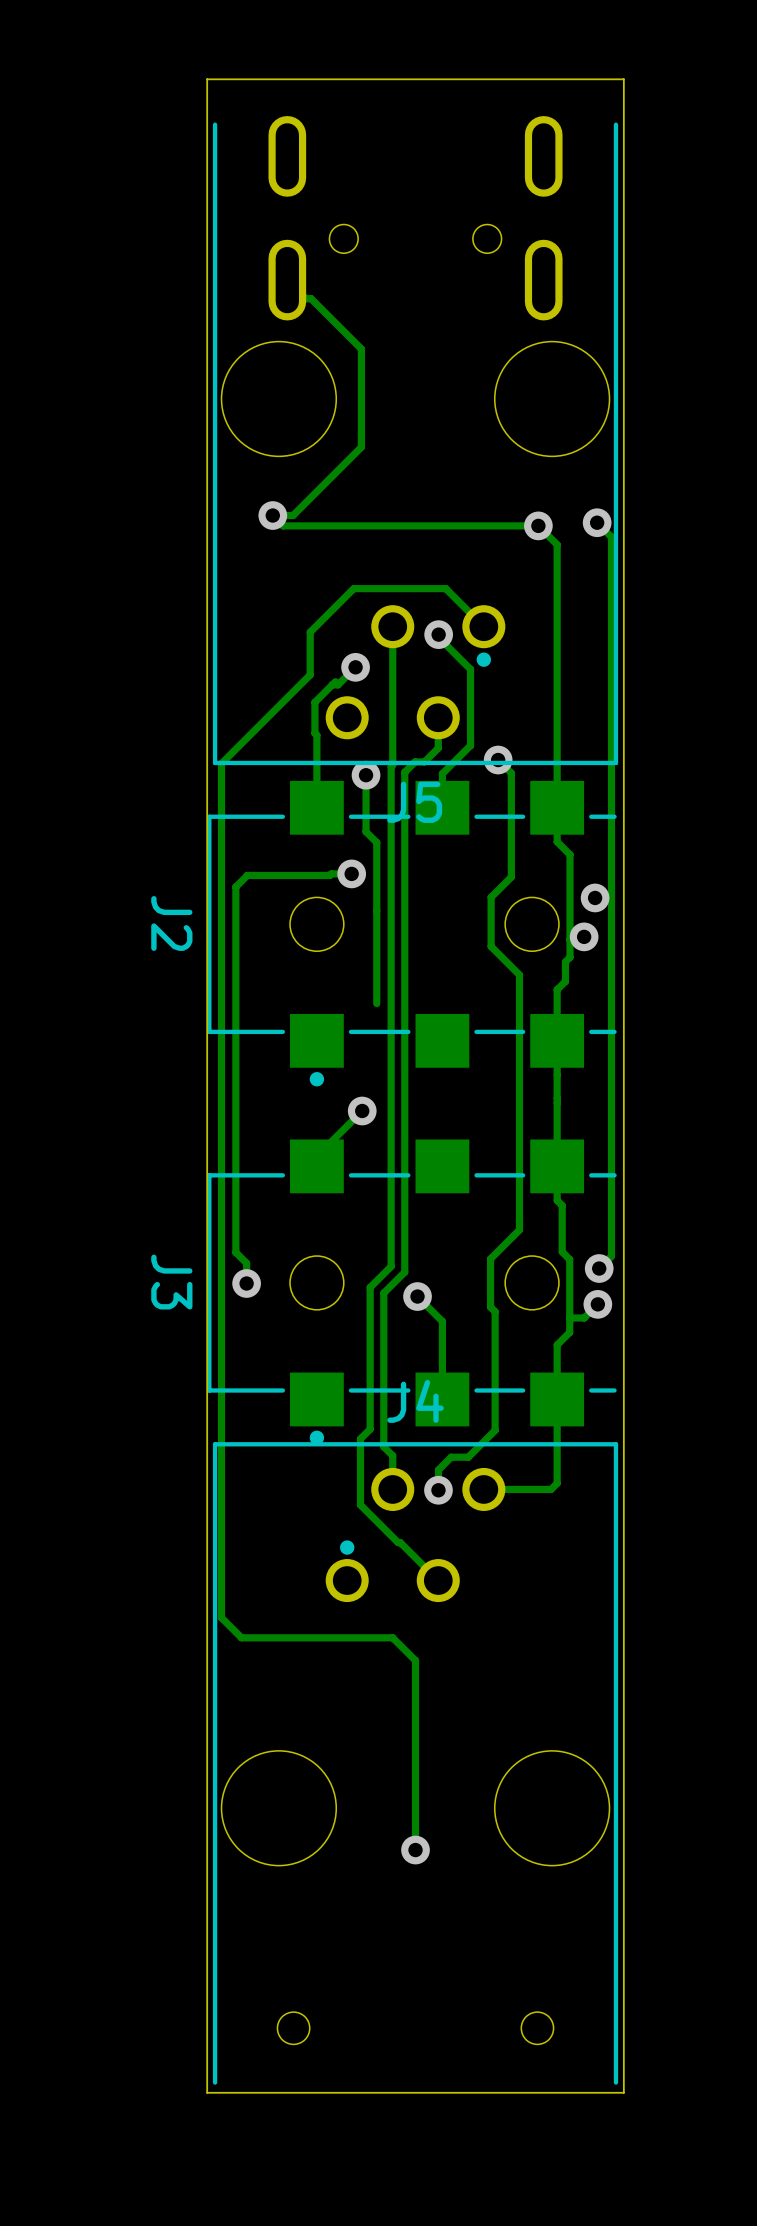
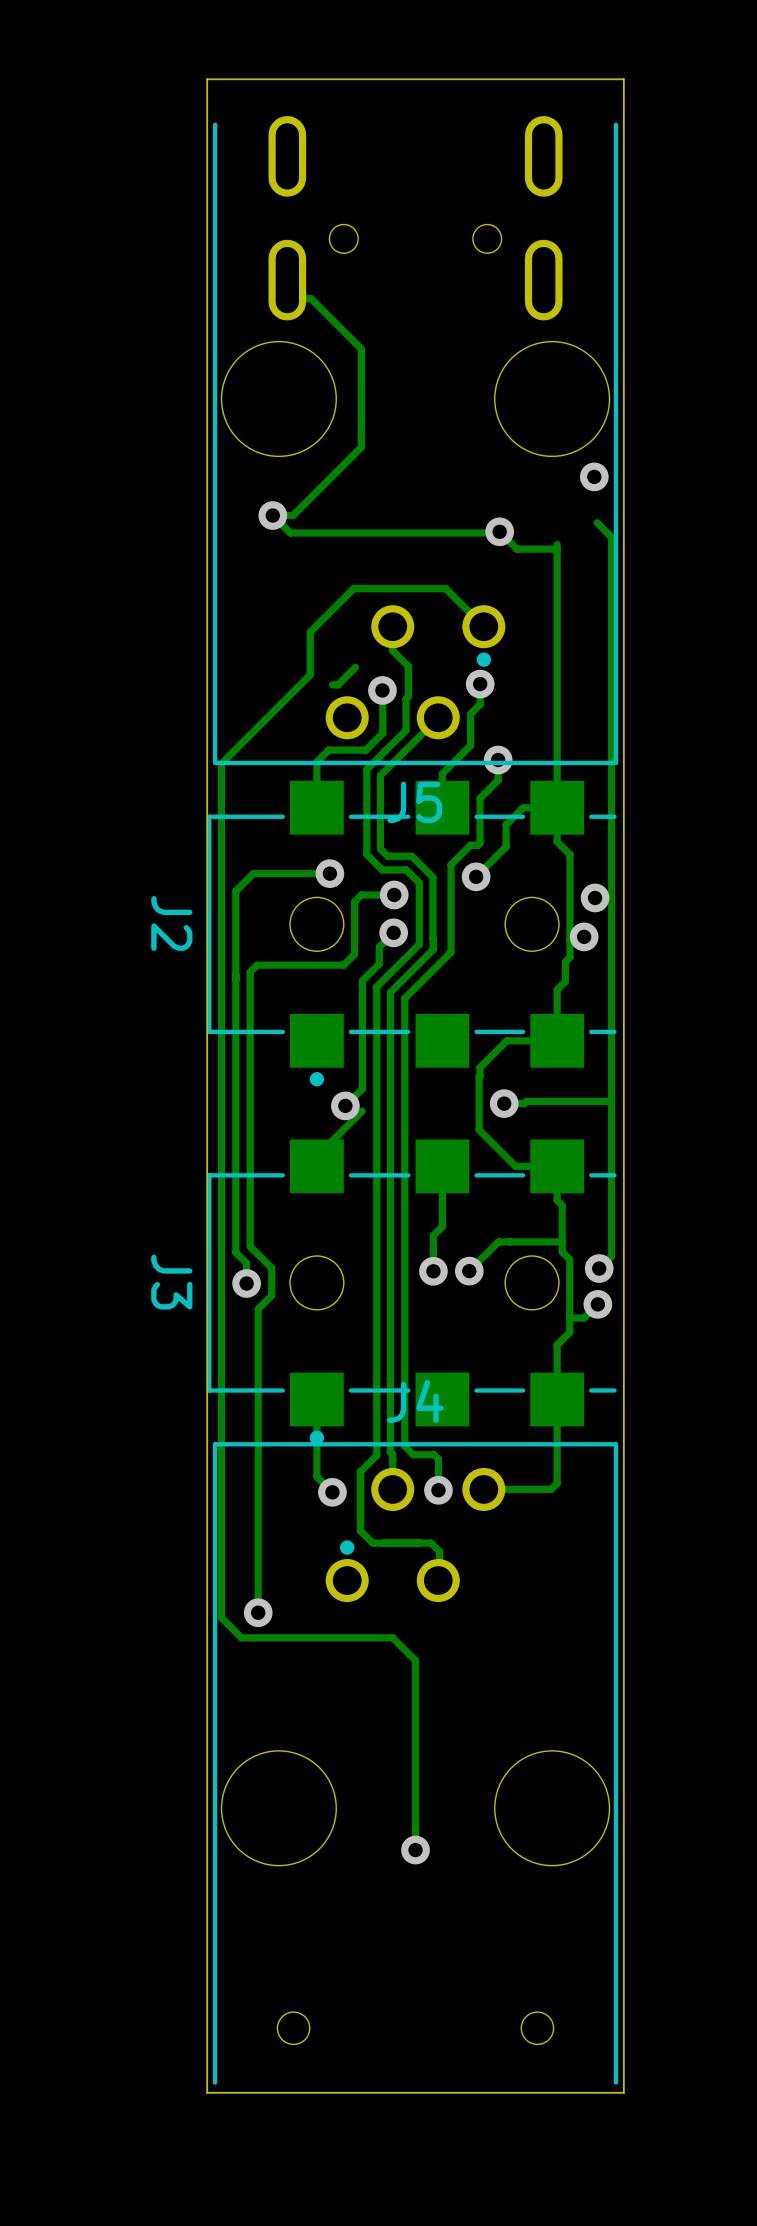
via: none -> (594, 476)
via: (597, 522) -> none
track: (283, 525) (538, 525) (557, 544) -> (283, 525) (290, 532) (499, 531) (516, 549) (557, 549)
via: (538, 525) -> none
via: none -> (499, 531)
track: (438, 634) (438, 637) (470, 669) (470, 713) -> (480, 684) (480, 704) (470, 713)
via: (438, 634) -> none
track: (392, 650) (391, 1266) (370, 1287) (370, 1429) (360, 1438) (360, 1471) -> (376, 1003) (376, 1455) (360, 1471)
via position: (355, 667) -> (382, 690)
track: (335, 681) (314, 702) (316, 761) -> (382, 690) (382, 733) (365, 750) (328, 750) (316, 761)
via: none -> (480, 684)
track: (438, 717) (438, 748) (424, 761) (415, 761) (404, 772) (404, 998) -> (438, 717) (380, 775) (380, 848) (387, 856) (411, 856) (432, 877) (432, 938)
track: (498, 760) (511, 773) (511, 877) (491, 897) (491, 946) (519, 974) (519, 1229) (490, 1258) (490, 1307) (495, 1311) (495, 1430) (468, 1457) (451, 1457) (438, 1469) -> (498, 760) (498, 780) (480, 798) (480, 843) (477, 845) (470, 845) (451, 864) (451, 952) (404, 998)
track: (366, 775) (366, 831) (376, 842) (376, 986) -> (392, 650) (408, 666) (406, 730) (366, 769) (366, 854) (382, 869) (406, 869) (419, 882) (419, 944) (376, 986)
via: (366, 775) -> none
track: none -> (557, 807) (523, 807) (506, 824) (506, 846) (476, 876)
track: (351, 873) (247, 875) (235, 886) (235, 891) -> (329, 873) (253, 873) (235, 891)
via position: (351, 873) -> (329, 873)
via: none -> (476, 876)
track: none -> (394, 894) (361, 894) (354, 901) (354, 954) (343, 965) (257, 965) (250, 972) (250, 1246) (271, 1268) (271, 1295) (258, 1309) (258, 1612)
via: none -> (394, 894)
track: none -> (393, 932) (379, 947) (379, 964) (362, 980) (362, 1088) (345, 1105)
via: none -> (393, 932)
track: none -> (433, 939) (433, 949) (390, 992) (390, 1452) (392, 1455)
track: (557, 1040) (557, 1166) -> (557, 1040) (506, 1040) (480, 1067) (479, 1077) (479, 1129) (515, 1166) (557, 1166)
track: none -> (611, 1101) (526, 1101) (524, 1103) (504, 1103)
via: none -> (504, 1103)
via position: (362, 1111) -> (345, 1105)
track: none -> (442, 1166) (442, 1226) (433, 1235) (433, 1271)
track: none -> (562, 1241) (498, 1241) (469, 1271)
via: none -> (469, 1271)
track: (404, 1272) (383, 1293) (383, 1446) (392, 1455) -> (404, 1272) (404, 1446) (413, 1454) (434, 1454) (438, 1459) (438, 1469)
track: (417, 1296) (442, 1321) (442, 1399) -> none
via position: (417, 1296) -> (433, 1271)
track: none -> (316, 1399) (316, 1476) (332, 1492)
via: none -> (332, 1492)
track: (360, 1504) (438, 1580) -> (360, 1504) (360, 1530) (372, 1543) (431, 1543) (439, 1551) (438, 1580)
via: none -> (258, 1612)

